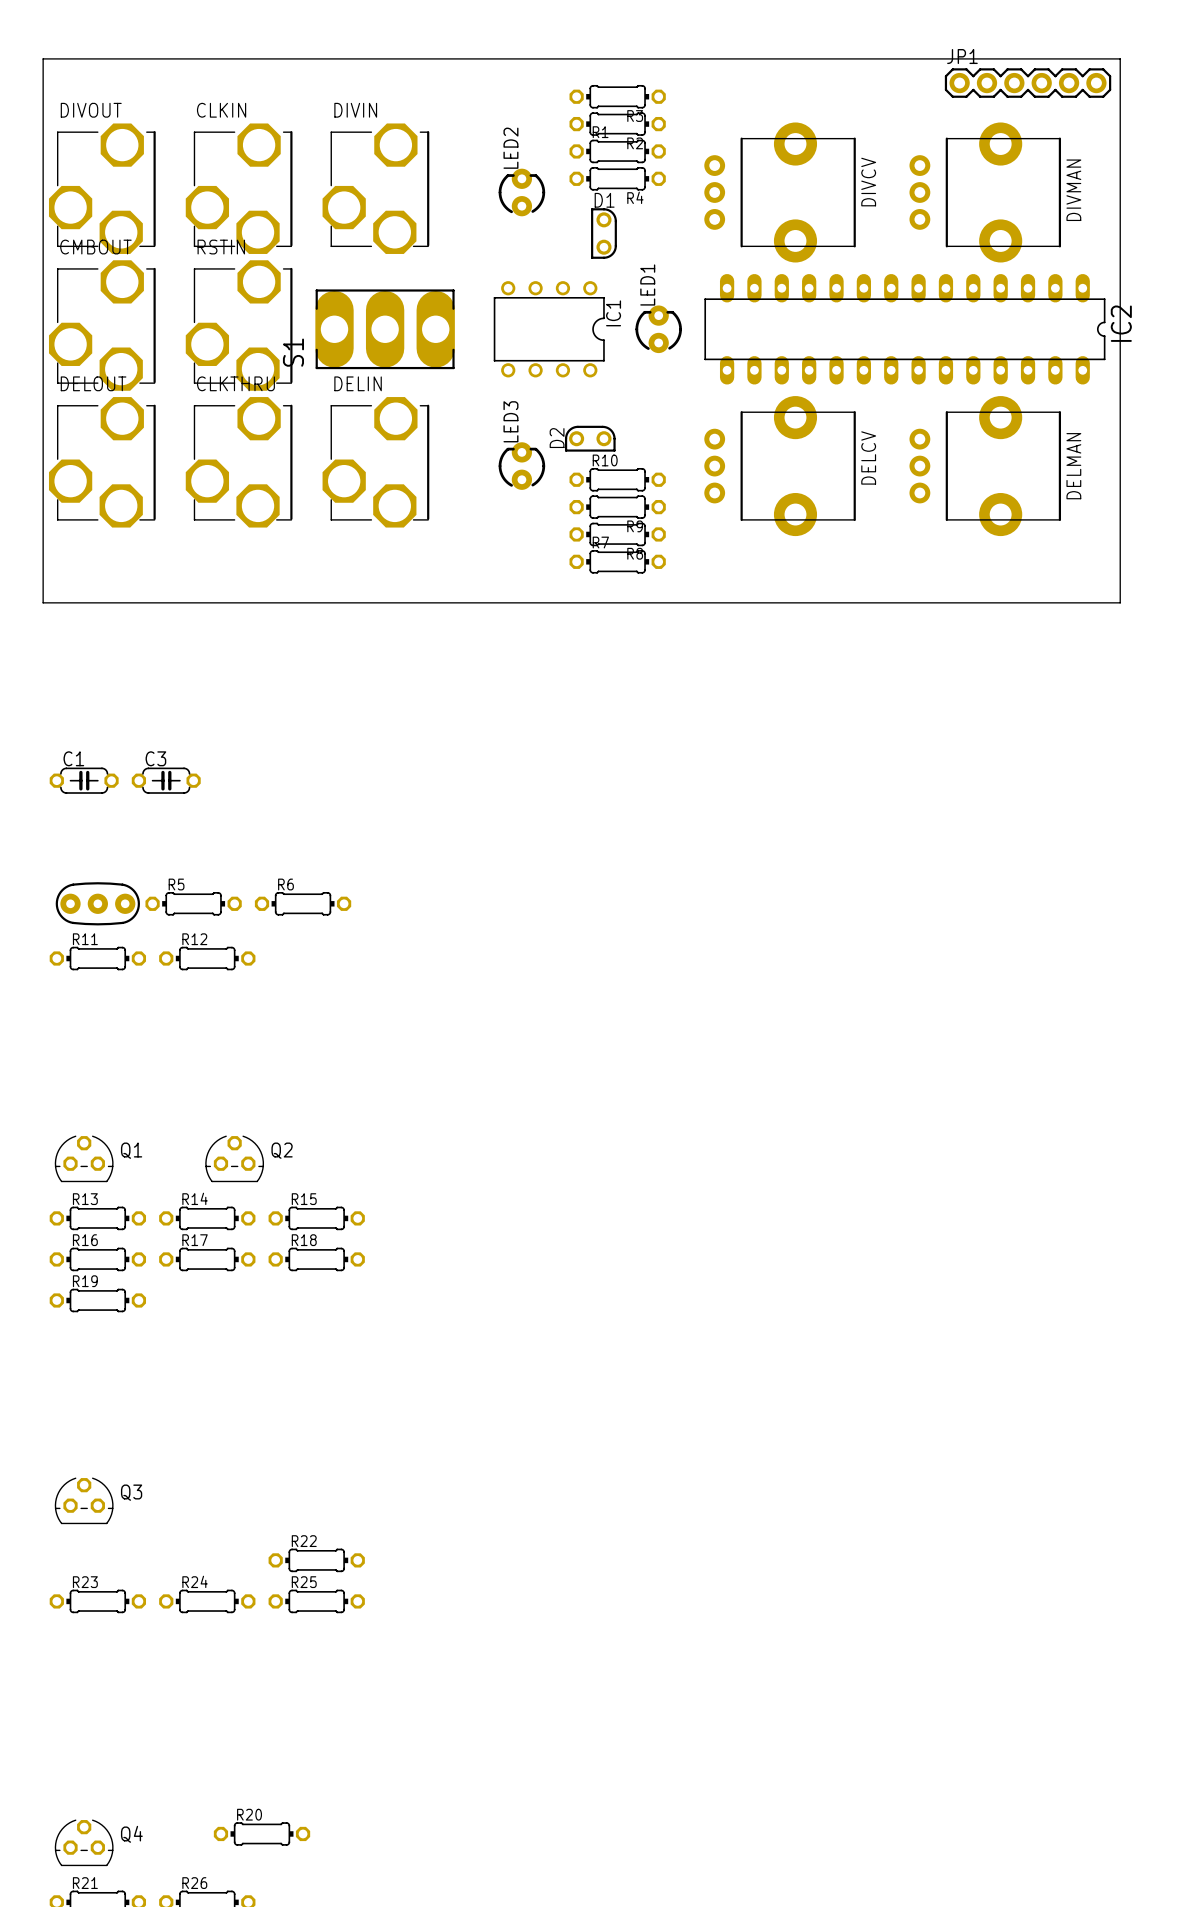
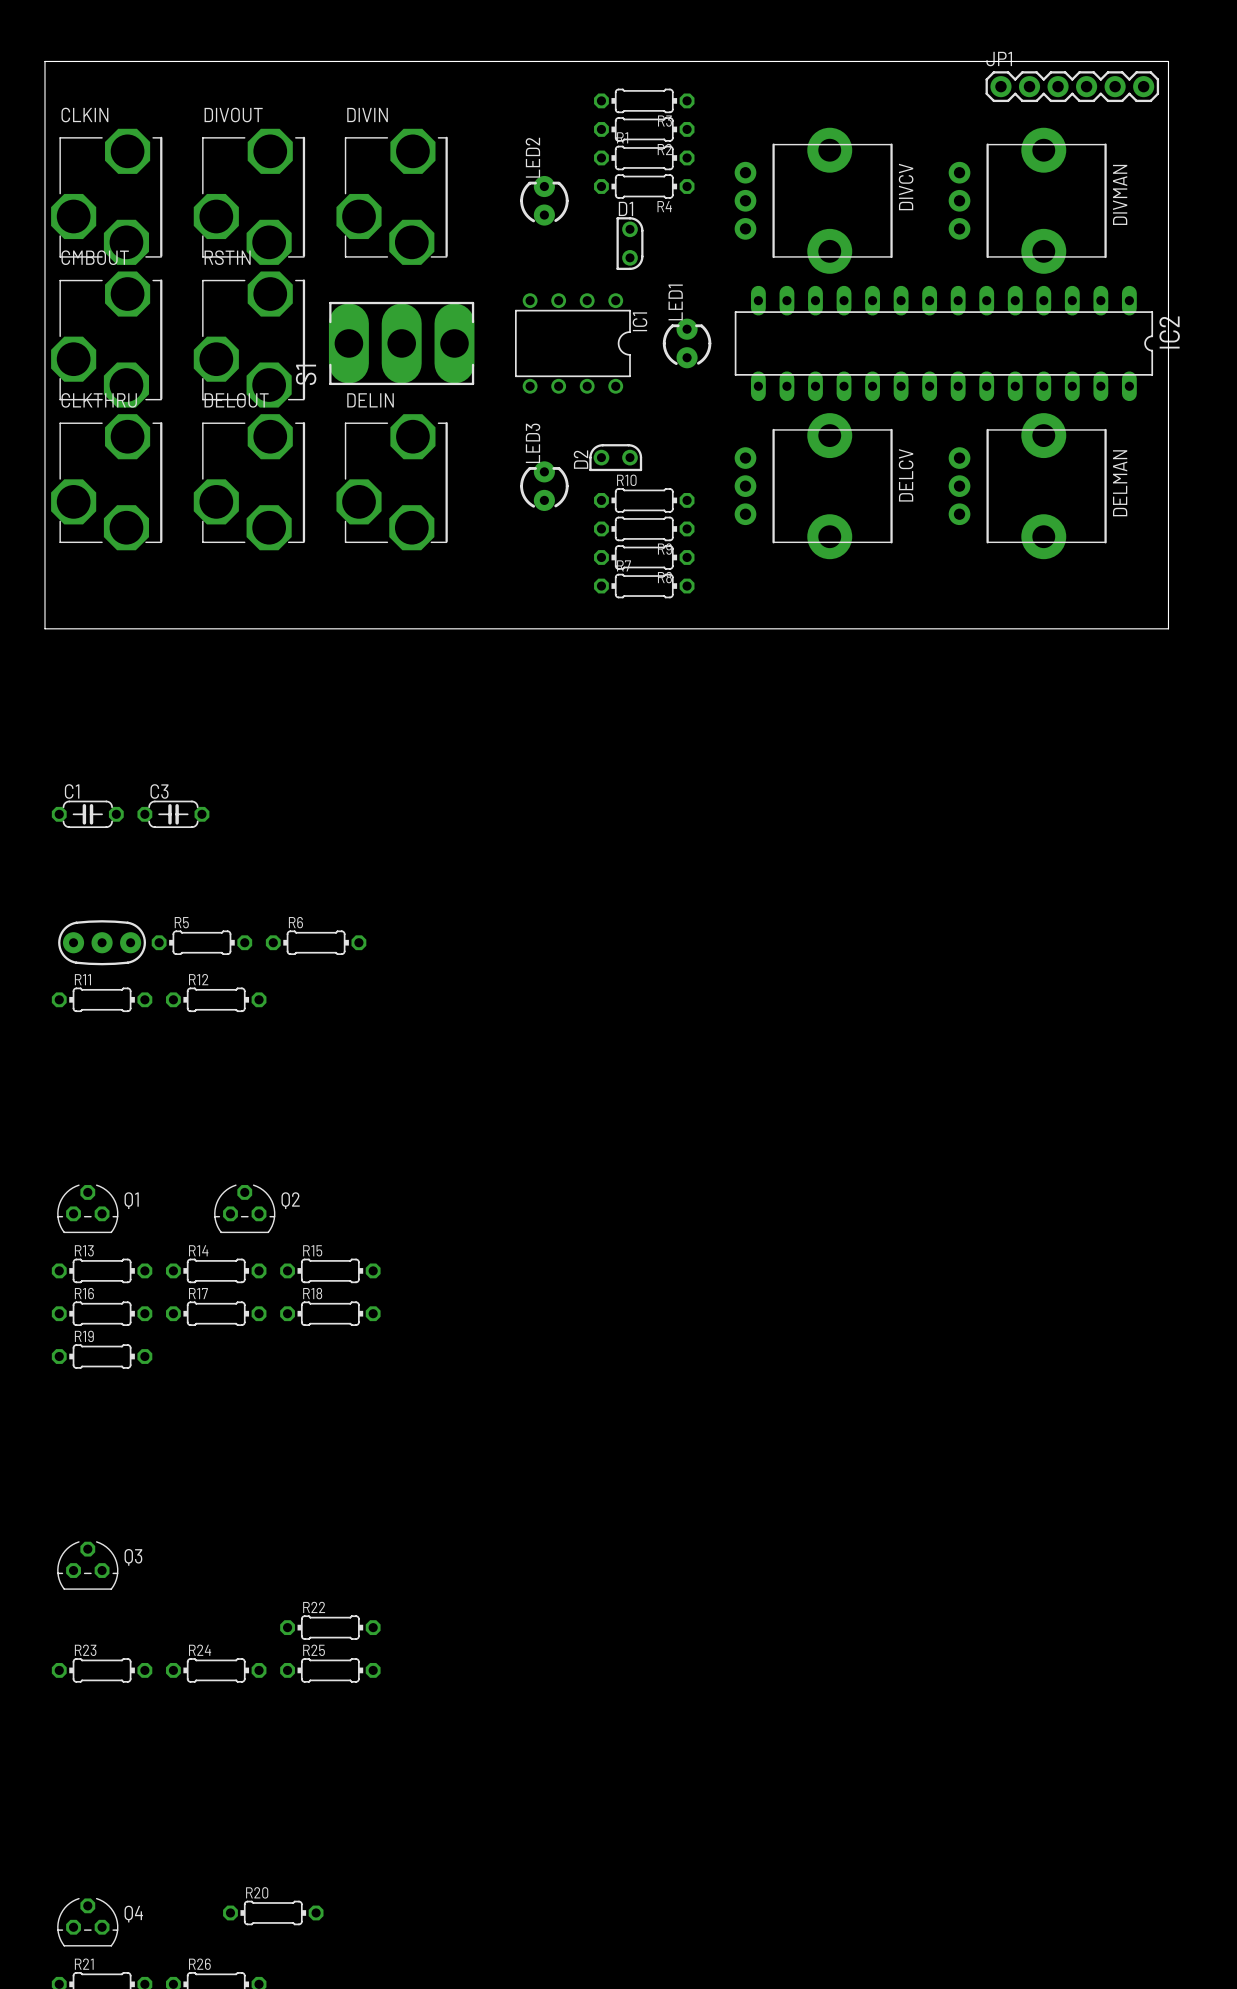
DIVOUT name: DIVOUT (91, 110) -> CLKIN (84, 115)
CLKIN name: CLKIN (221, 110) -> DIVOUT (233, 115)
DELOUT name: DELOUT (93, 383) -> CLKTHRU (99, 400)
CLKTHRU name: CLKTHRU (235, 383) -> DELOUT (236, 400)

